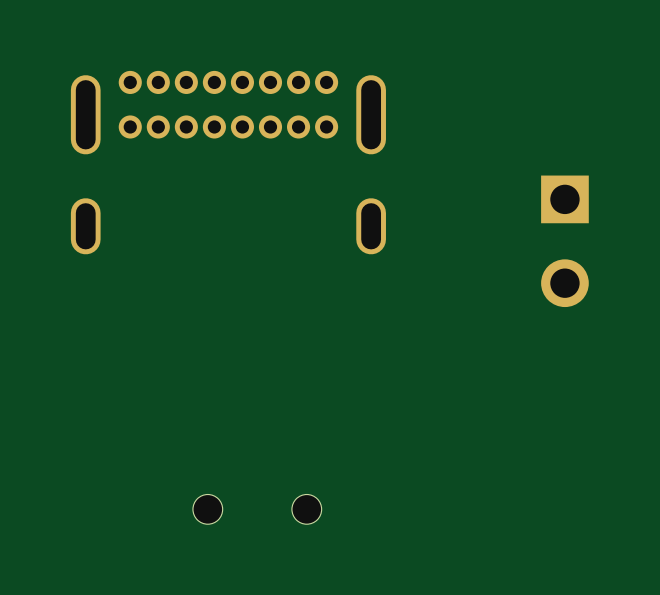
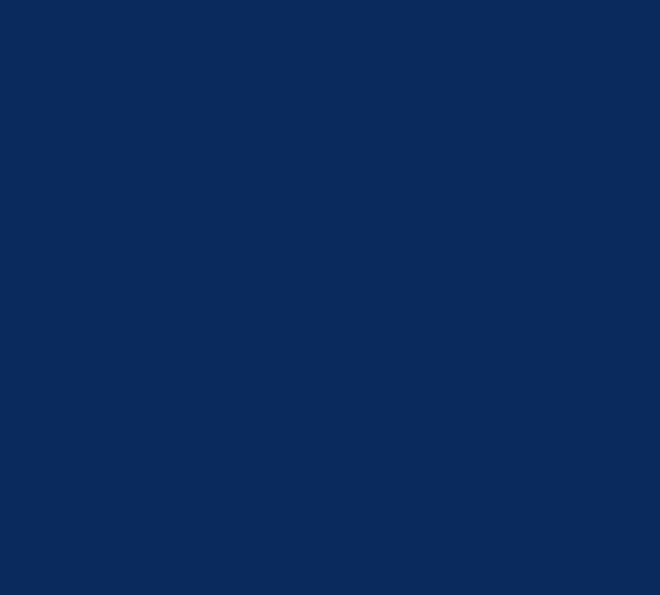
part: (228, 162) -> none
part: (564, 241) -> none
part: (257, 509) -> none

